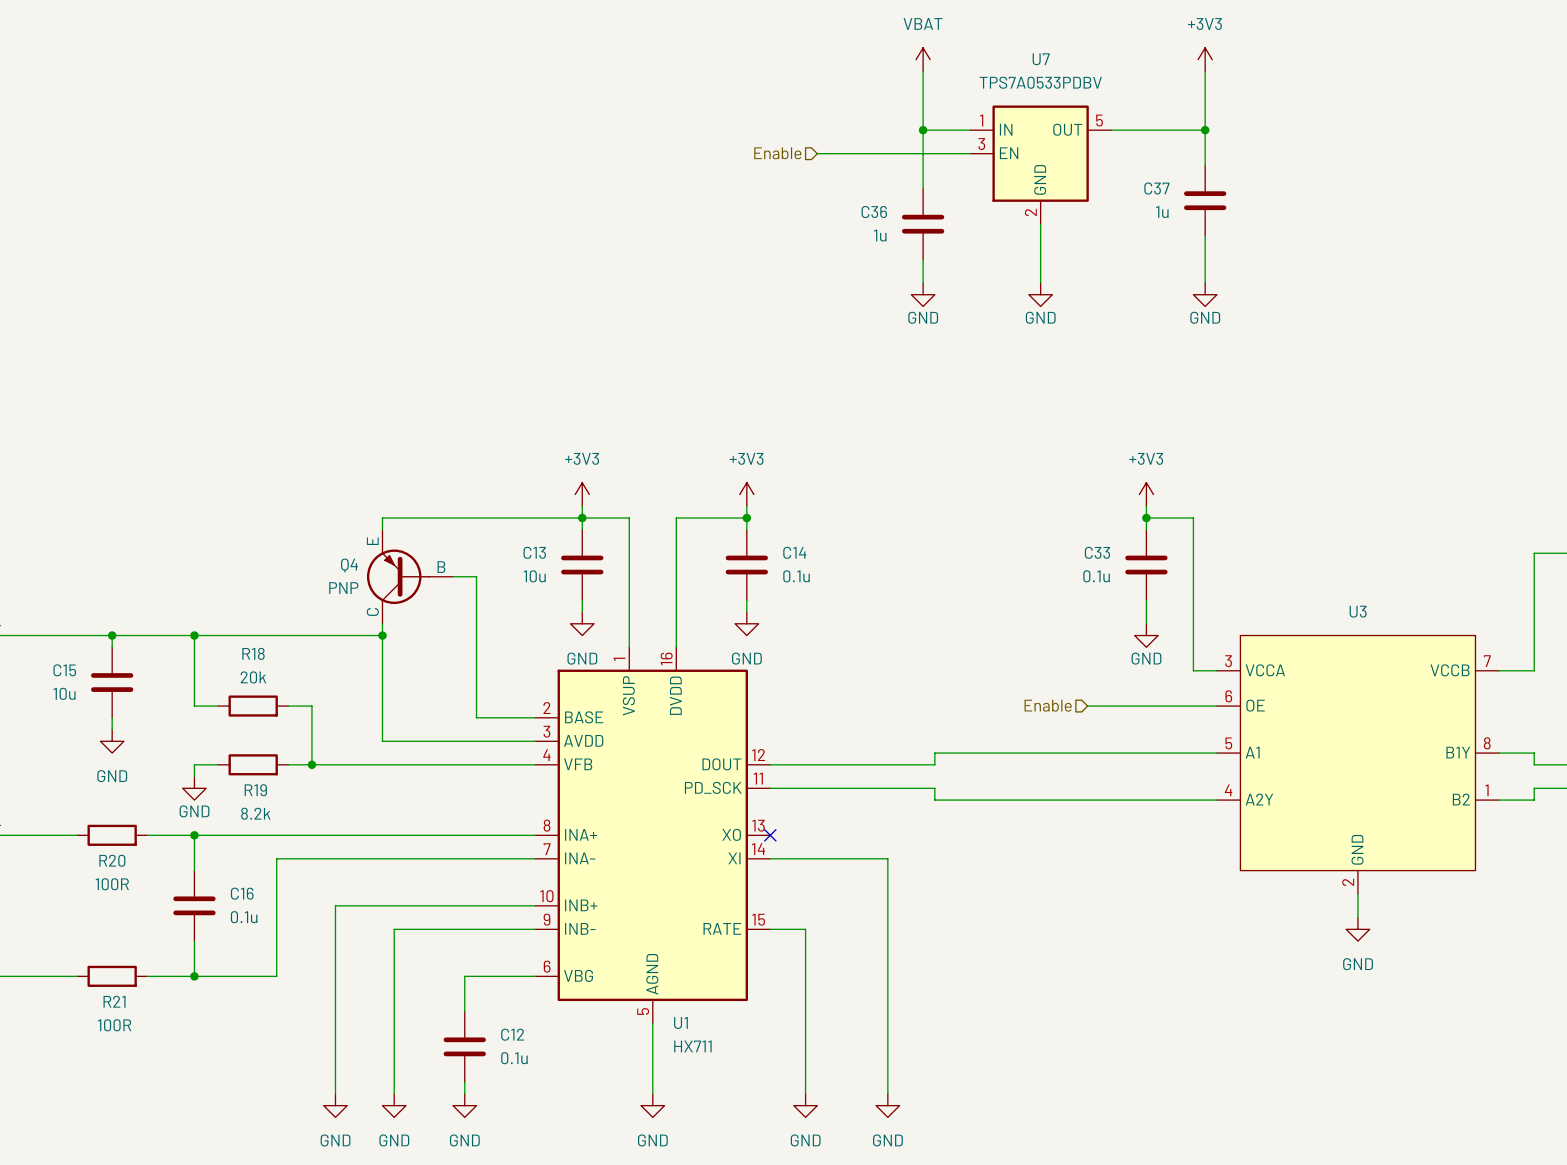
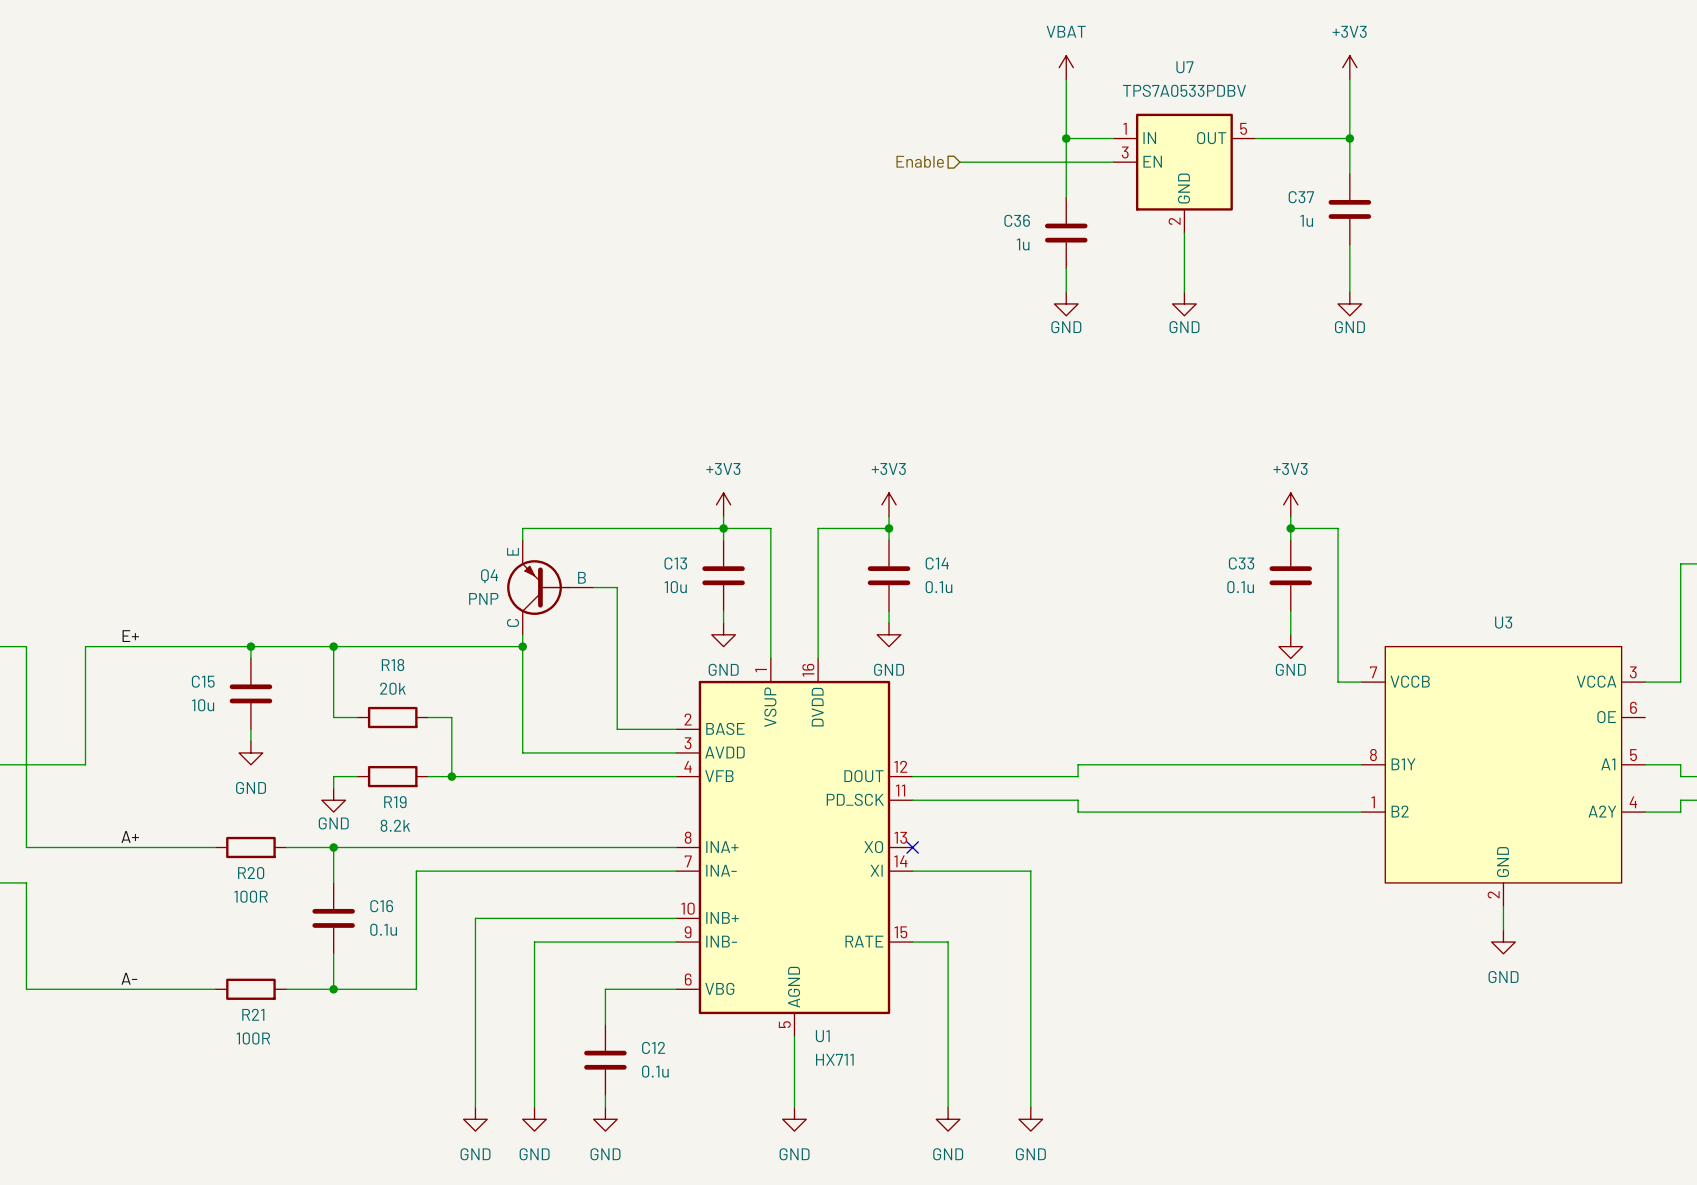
hierarchical label: Enable (1048, 705) -> none
wire: (1087, 706) (1216, 706) -> none
U3 flip: as is (1357, 753) -> left-right (1503, 764)

